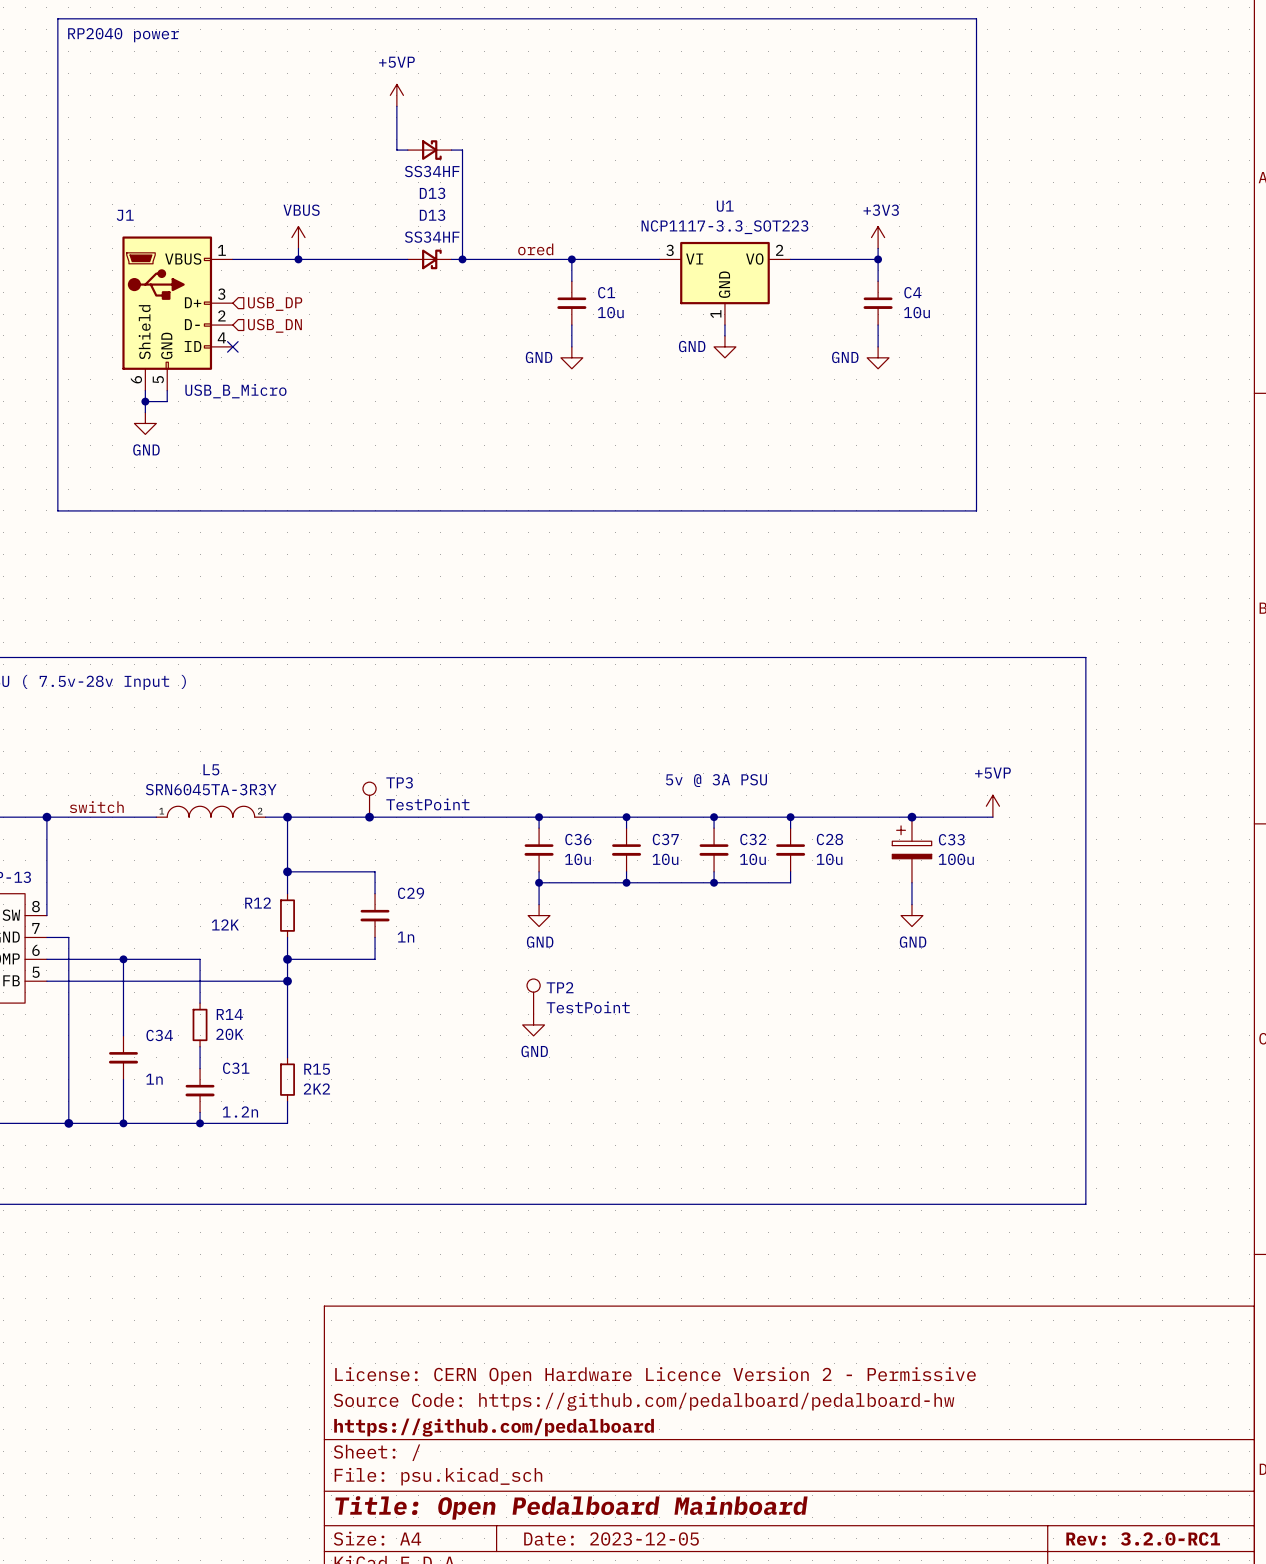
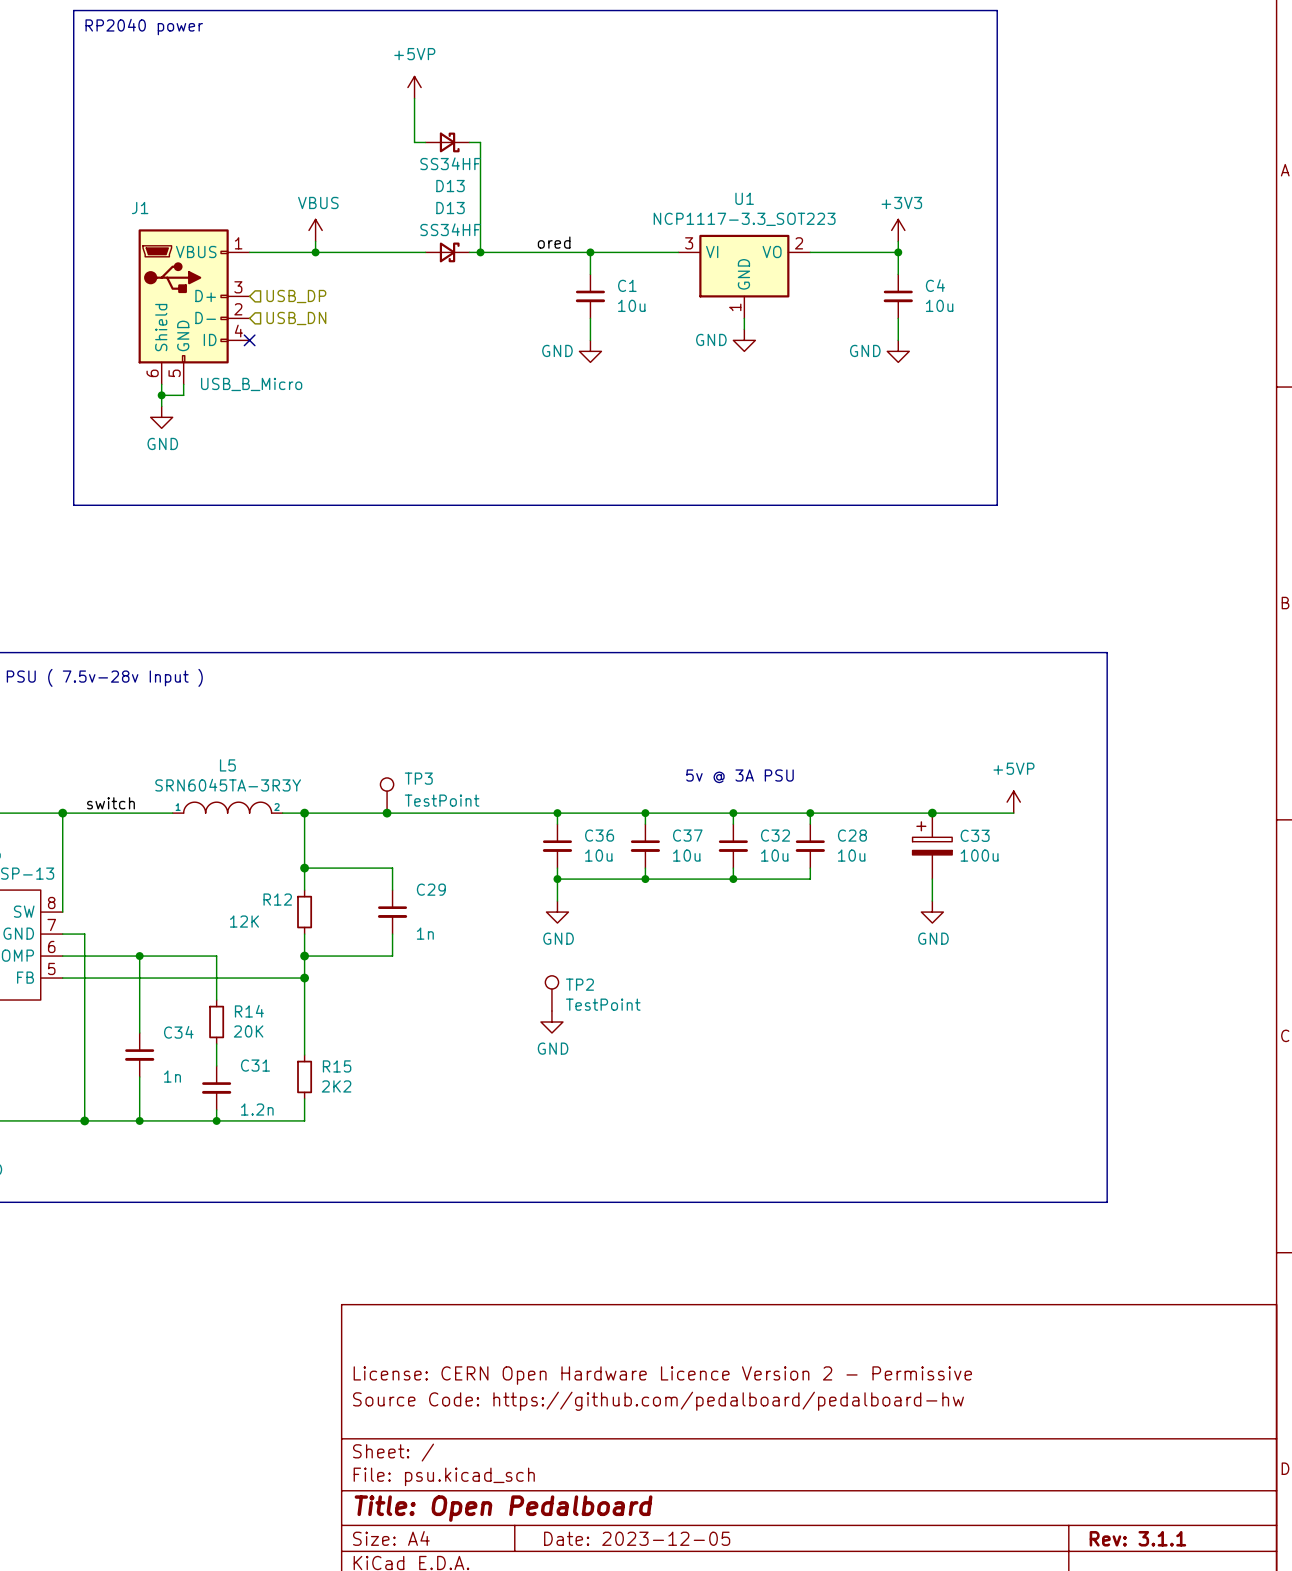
title block: https://github.com/pedalboard (494, 1427) -> none
title block: Title: Open Pedalboard Mainboard (571, 1507) -> Title: Open Pedalboard (503, 1508)
title block: Rev: 3.2.0-RC1 (1143, 1538) -> Rev: 3.1.1 (1137, 1538)

